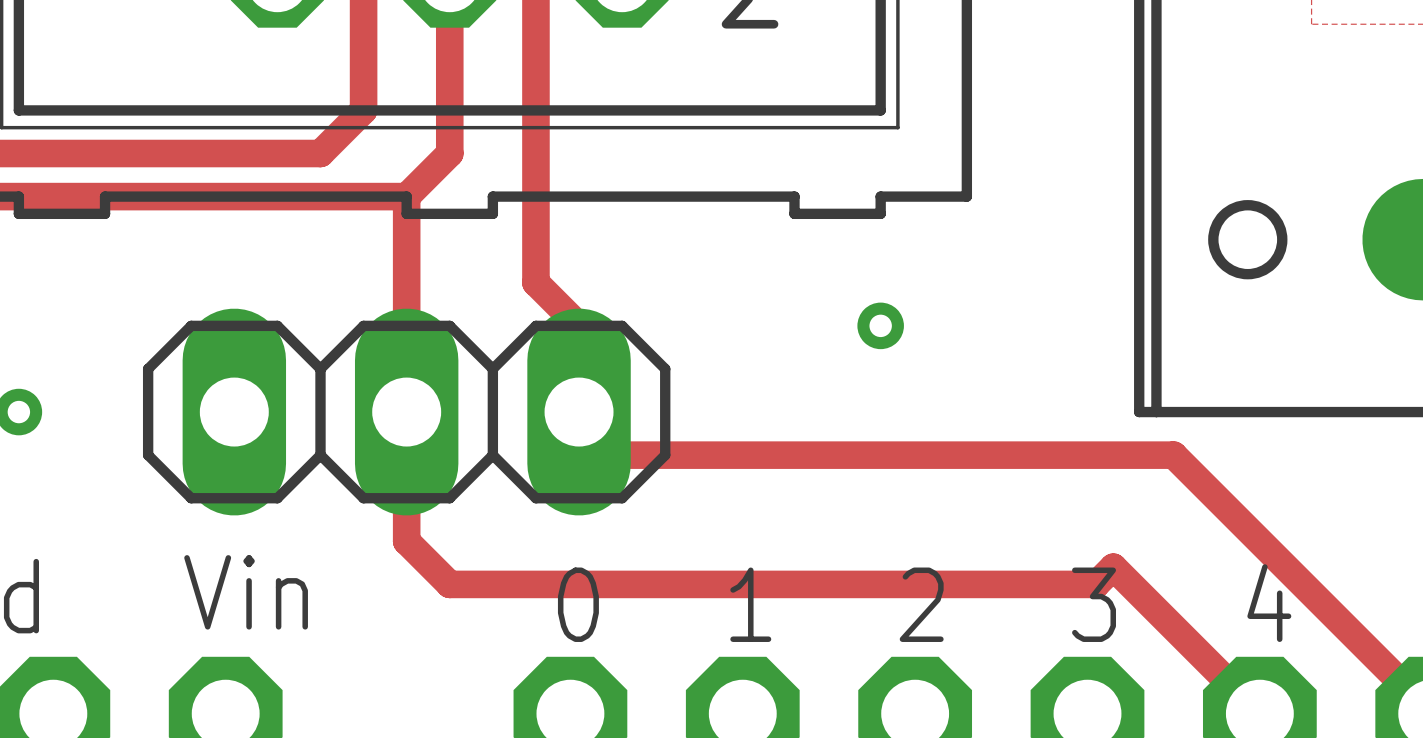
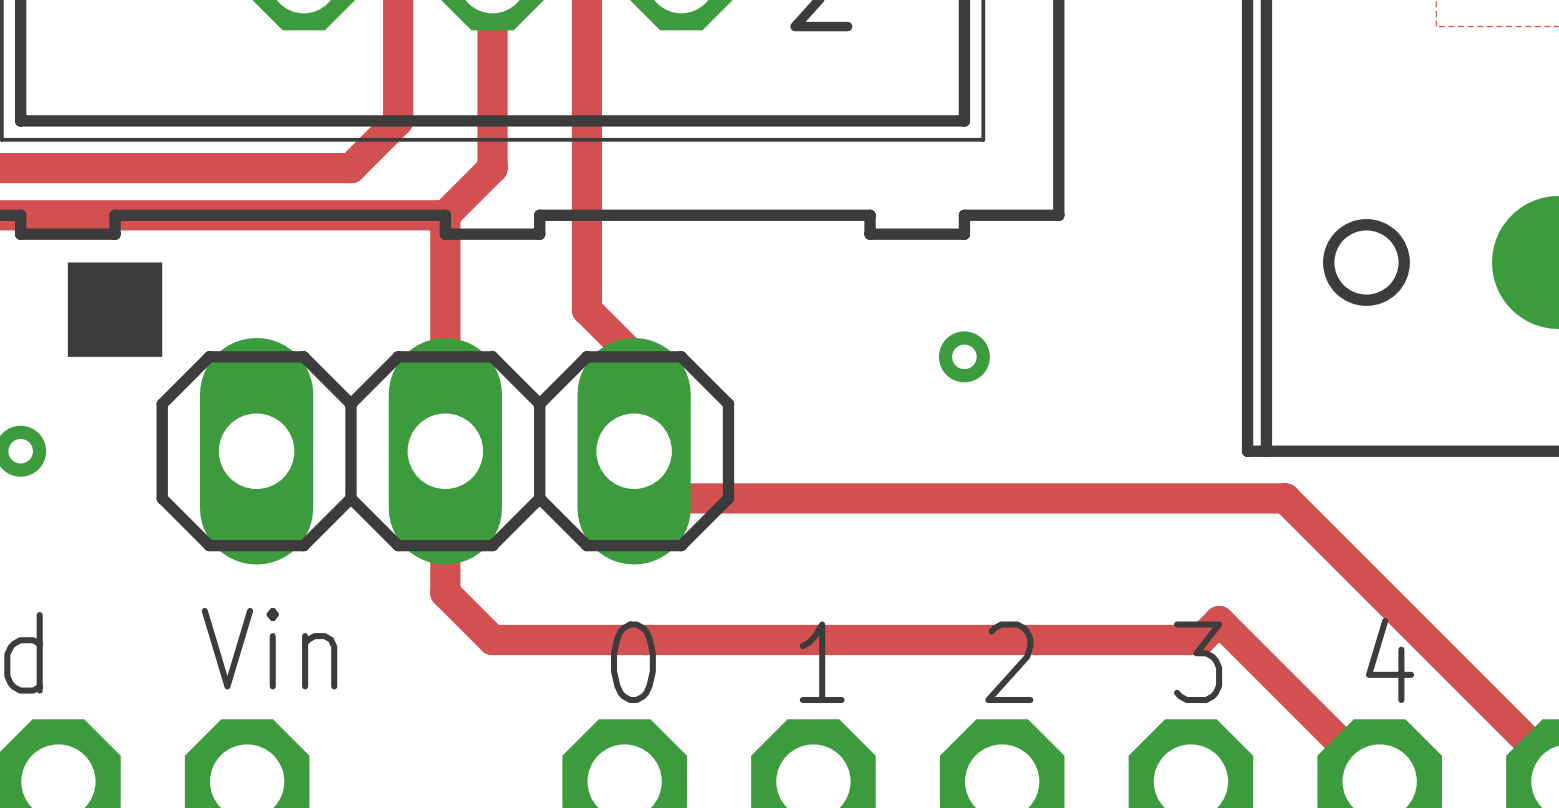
drawing: none -> [67, 262, 163, 357]

